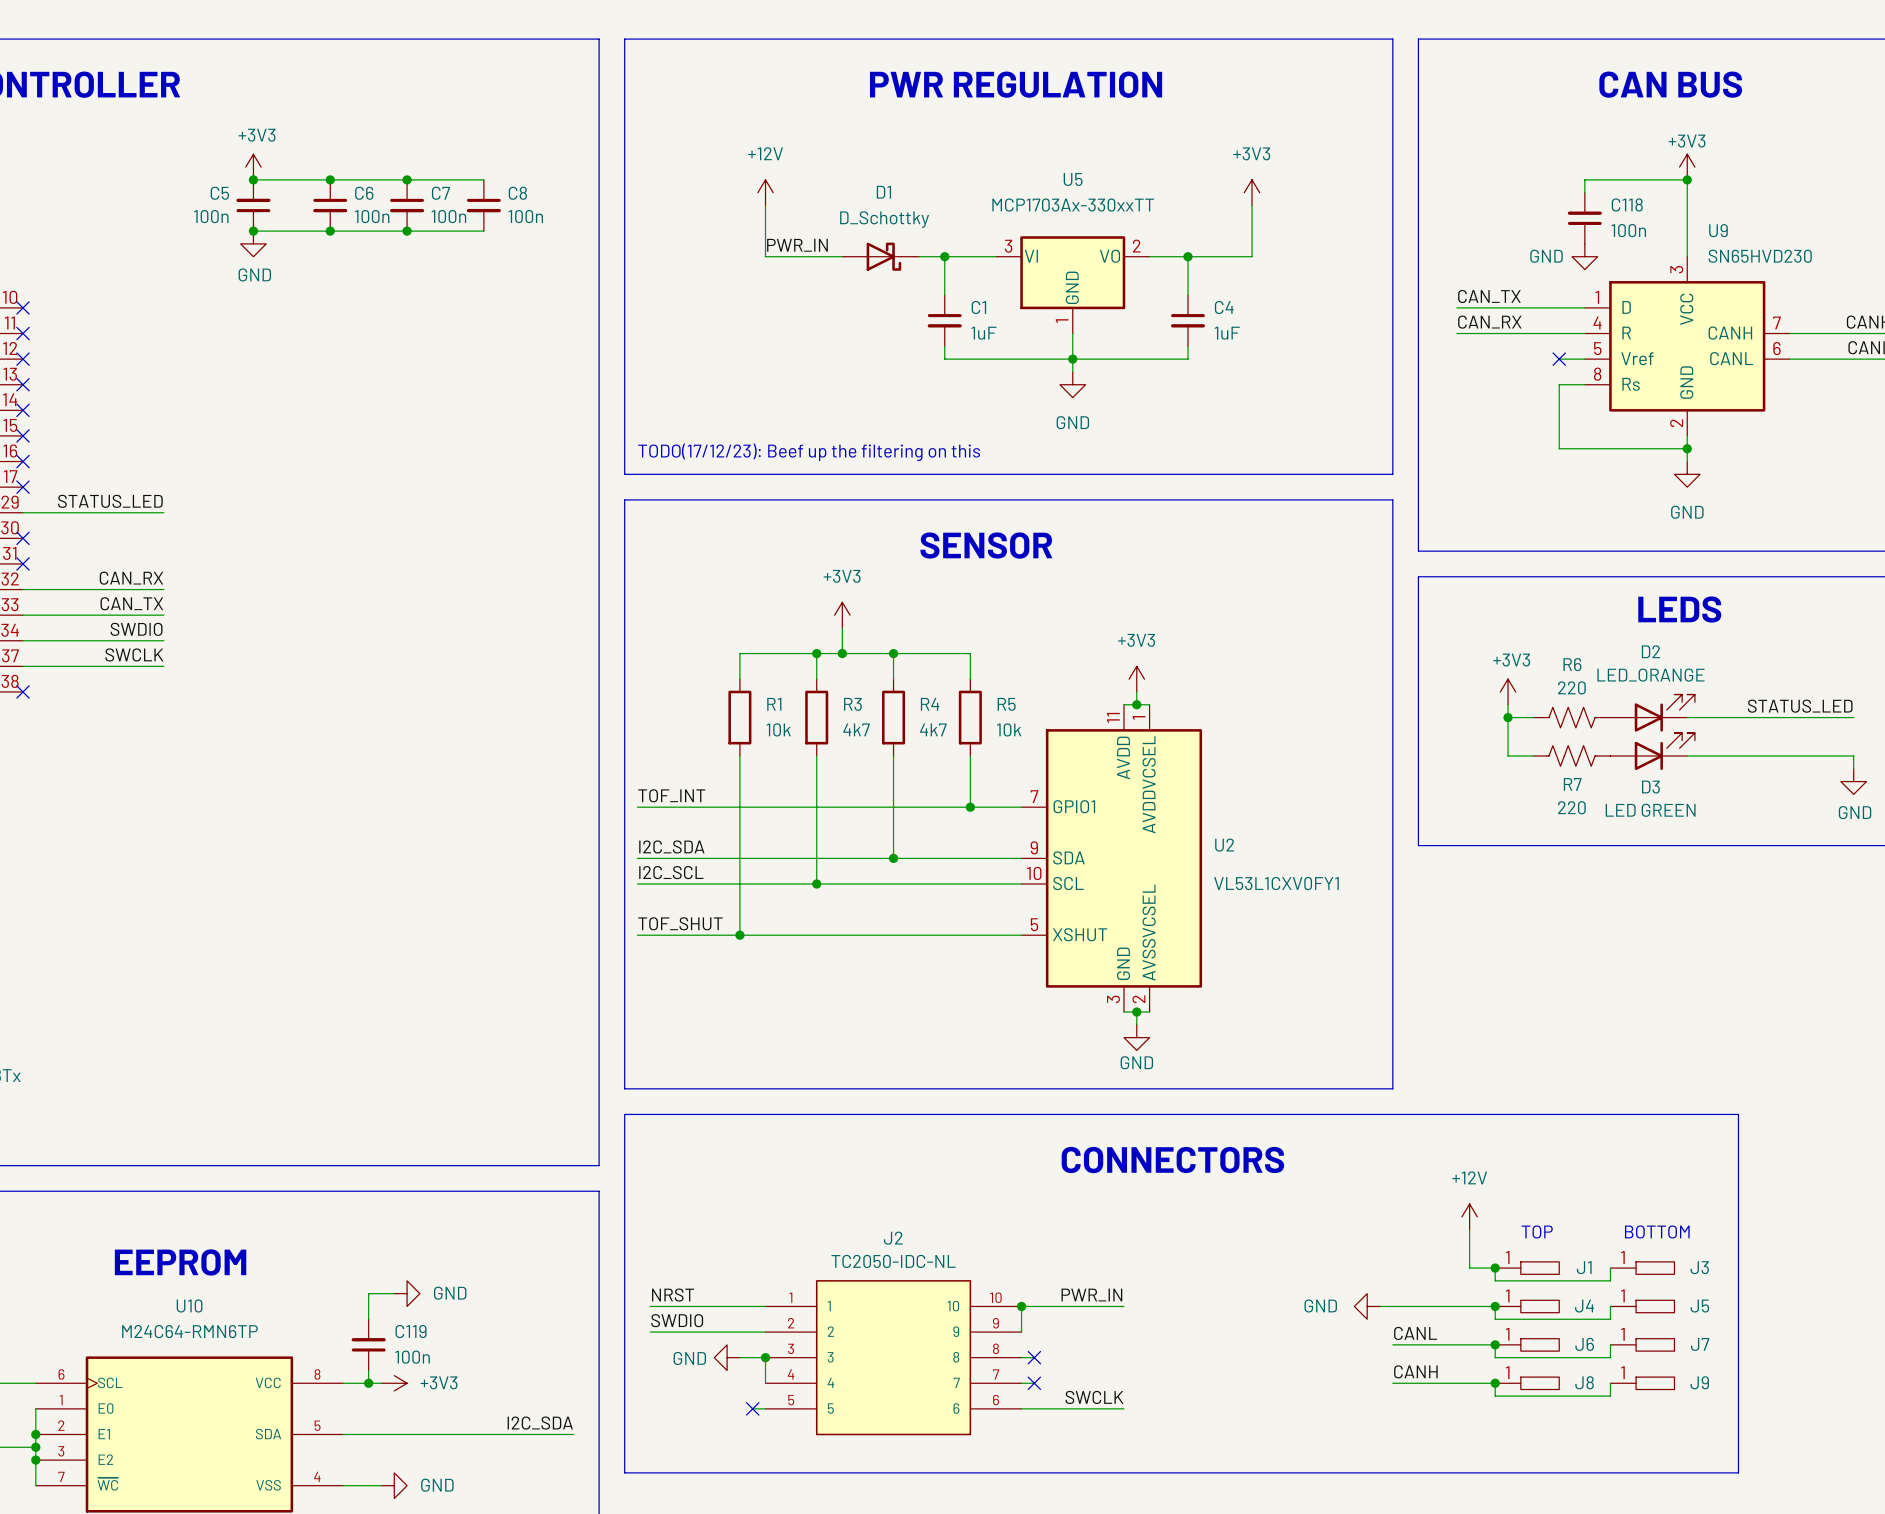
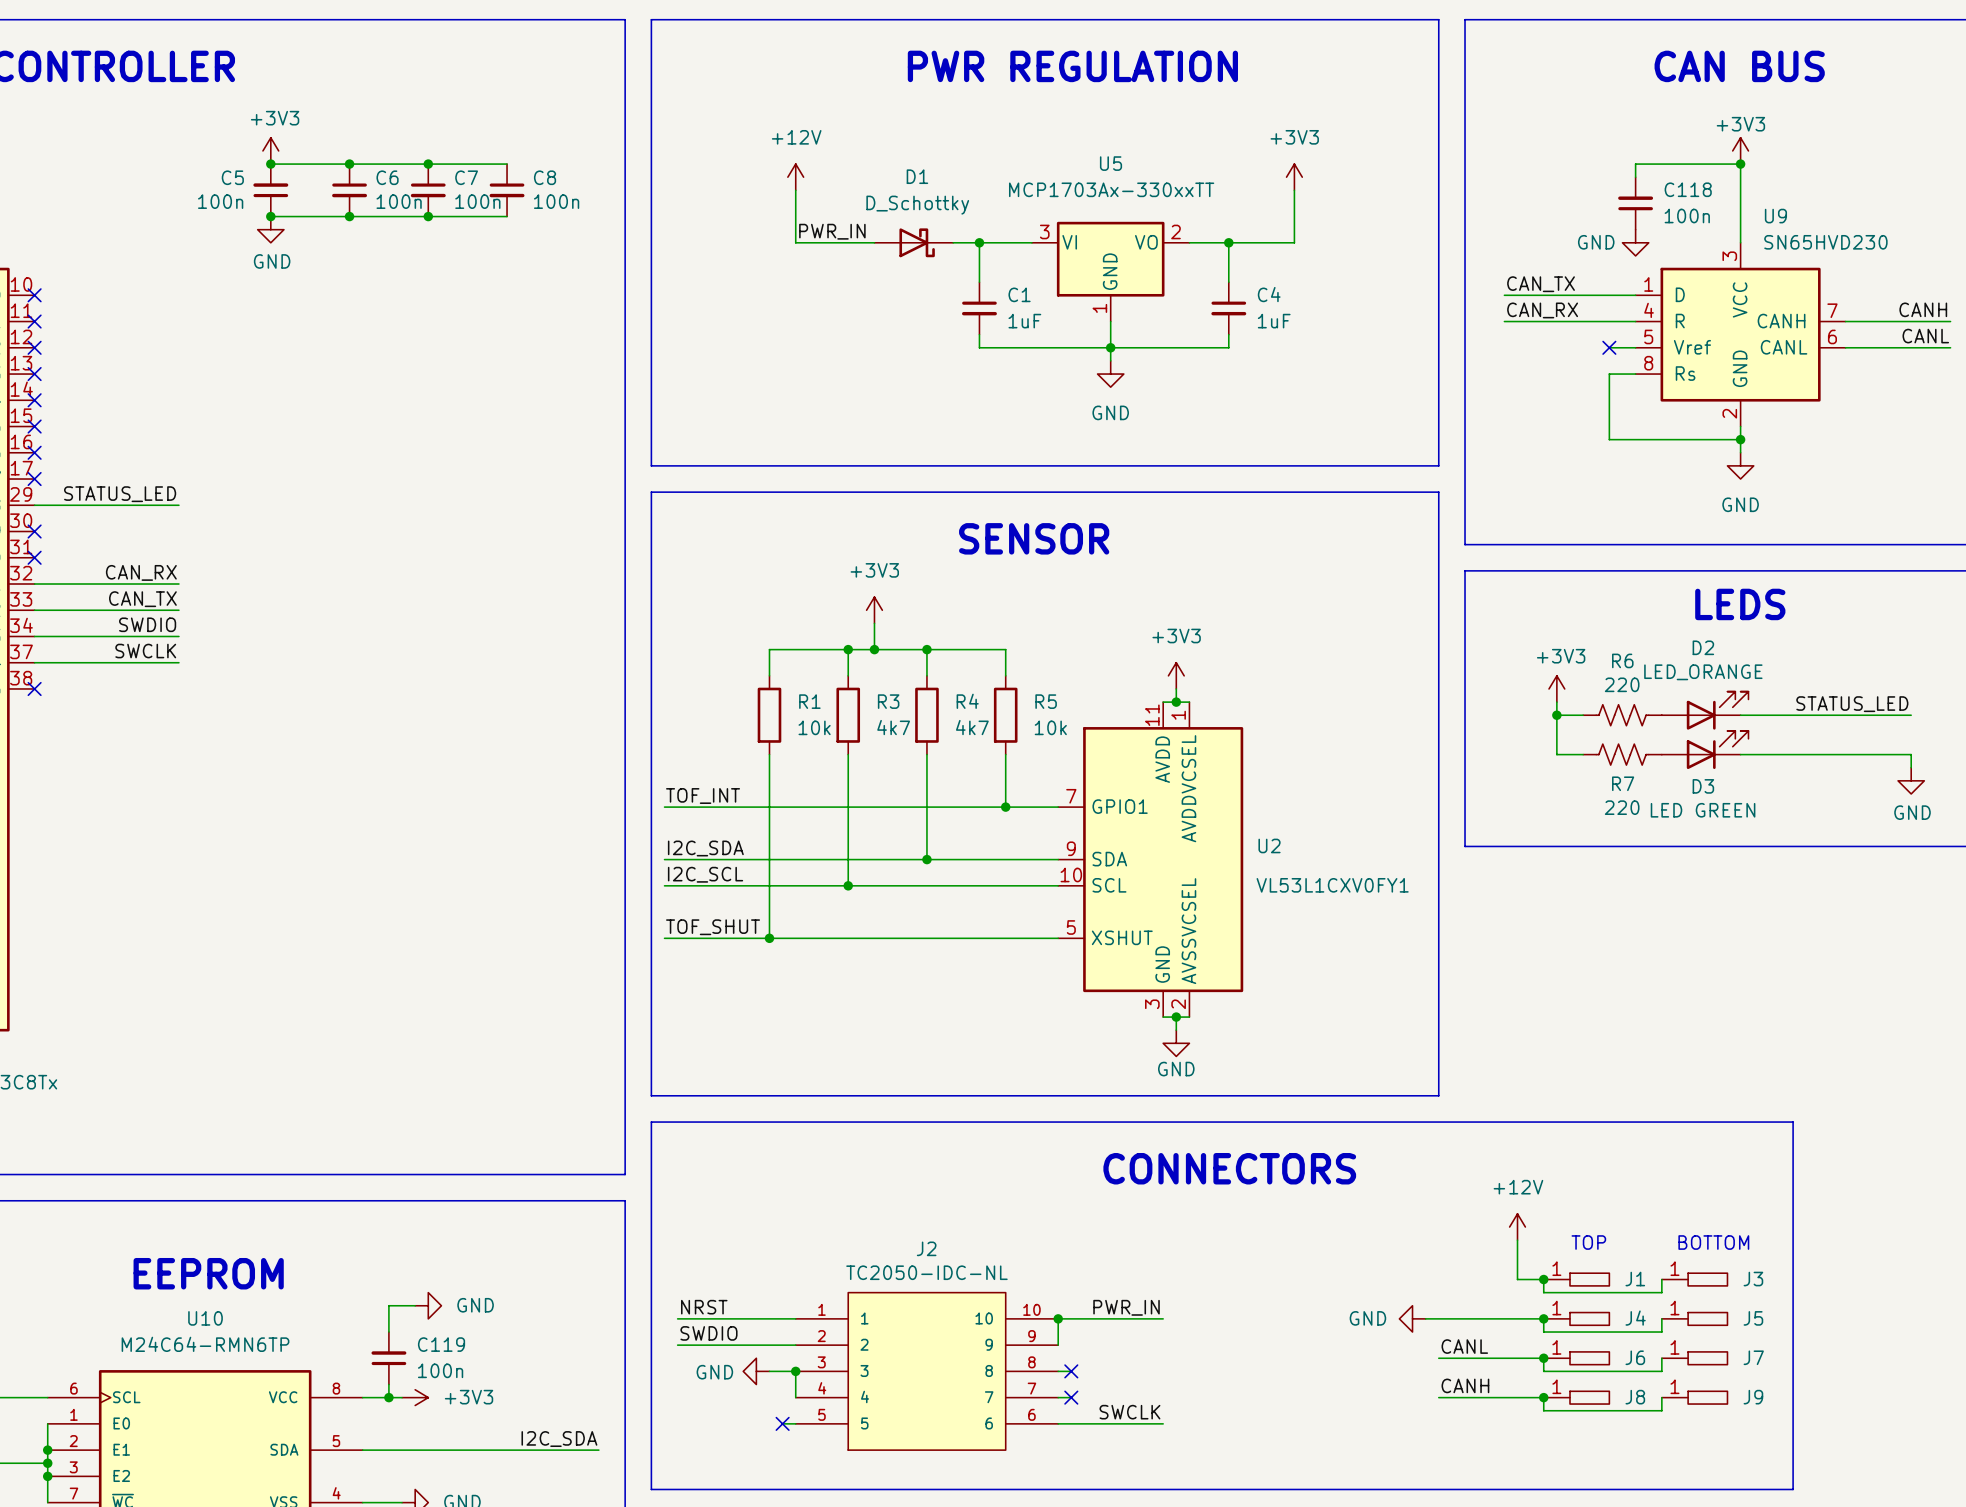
text: TODO(17/12/23): Beef up the filtering on this (809, 452) -> none

